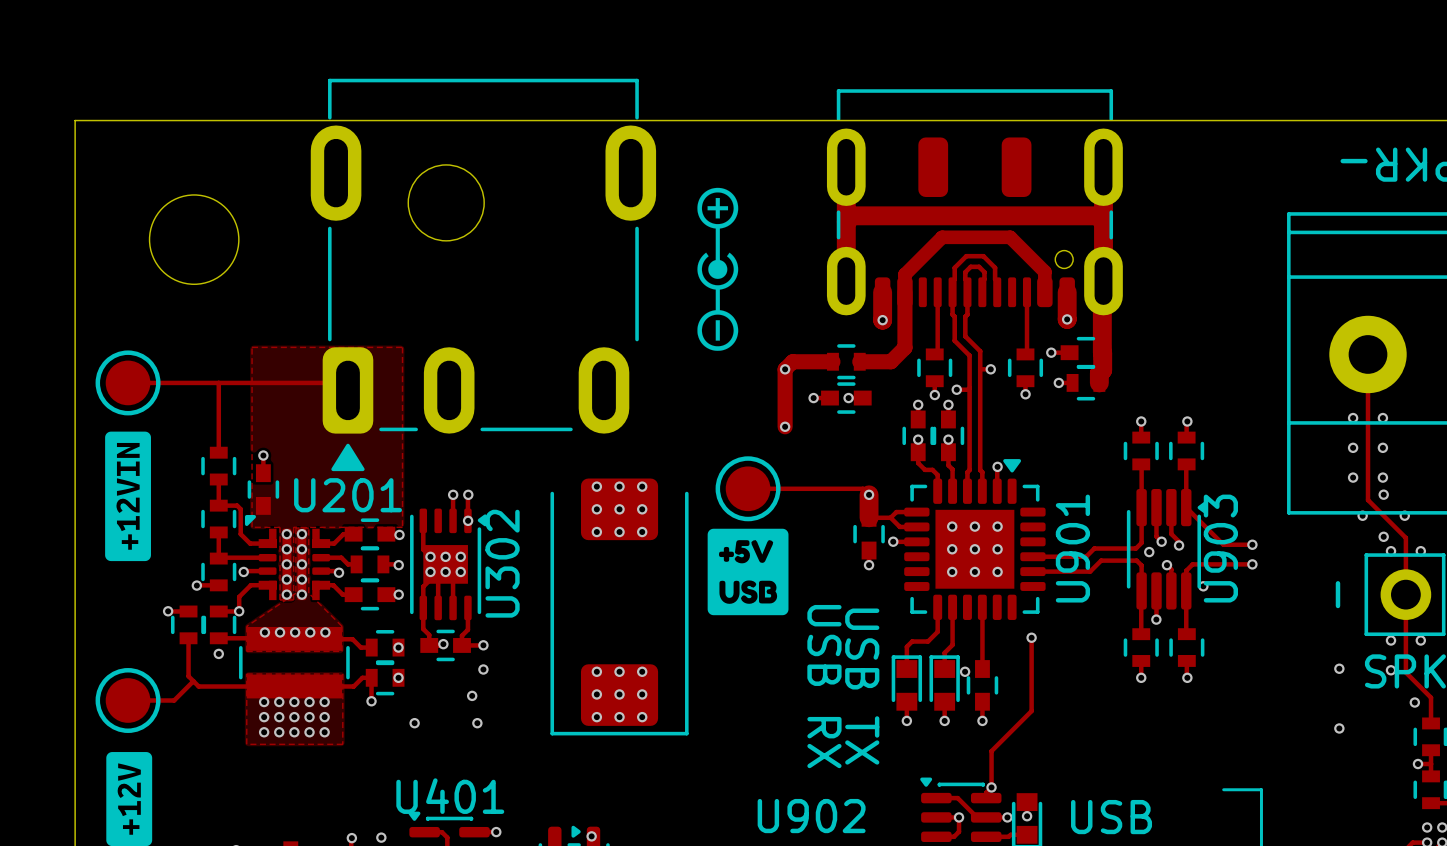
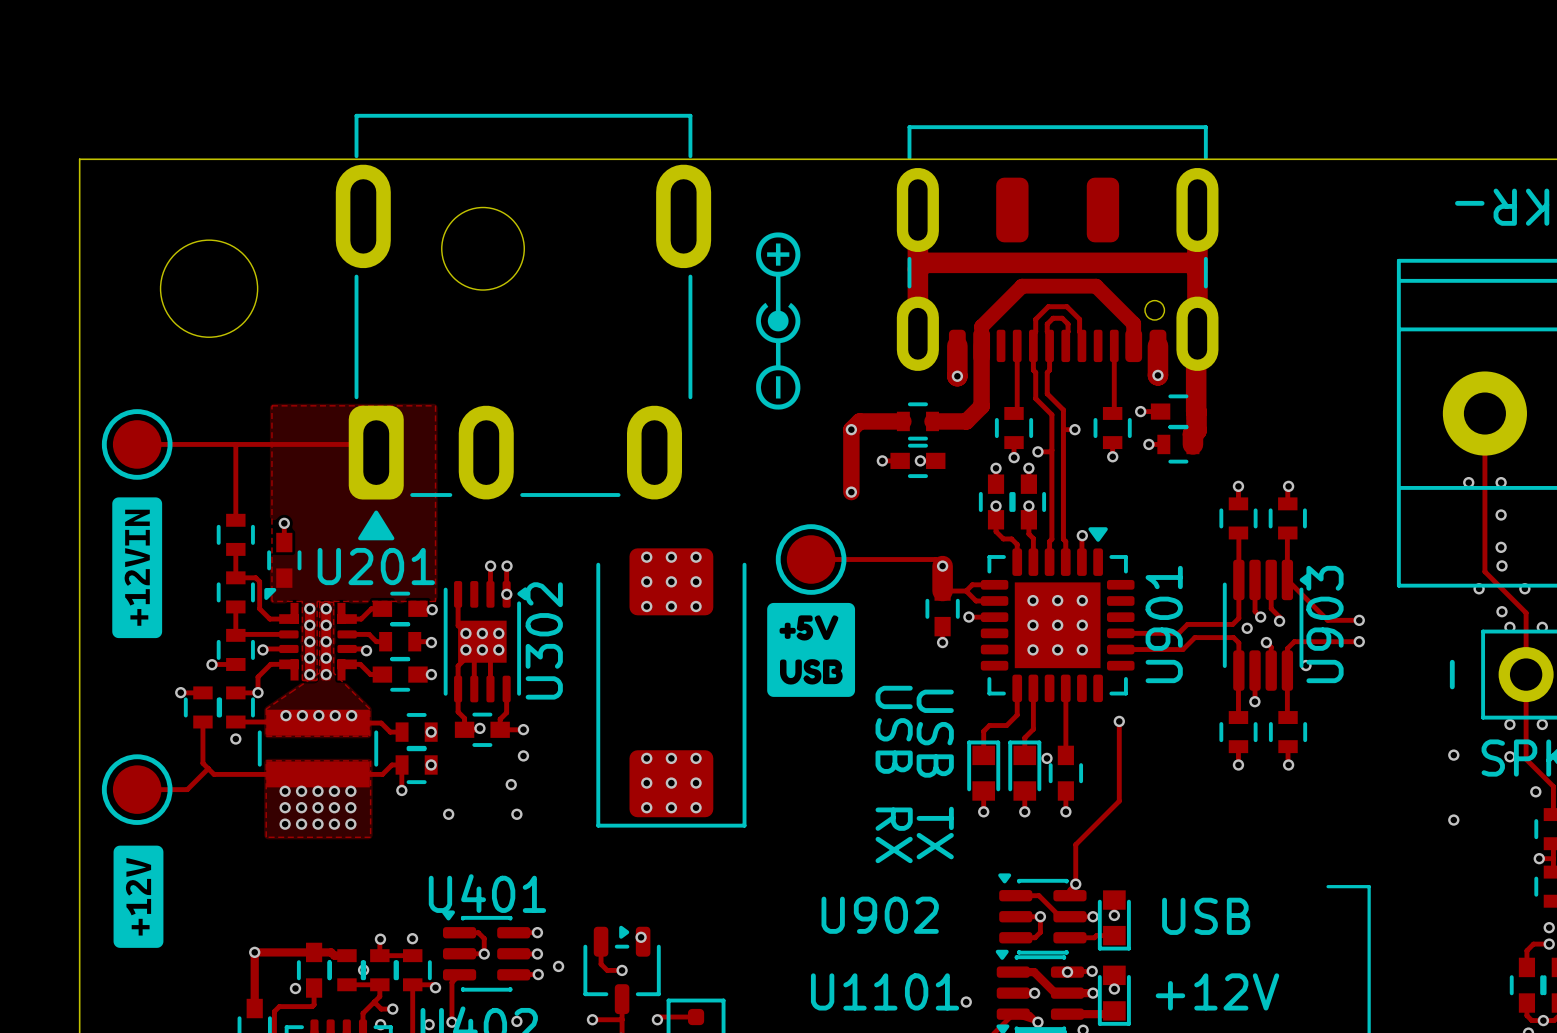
via: (1353, 447) -> none
via: (1353, 477) -> none

